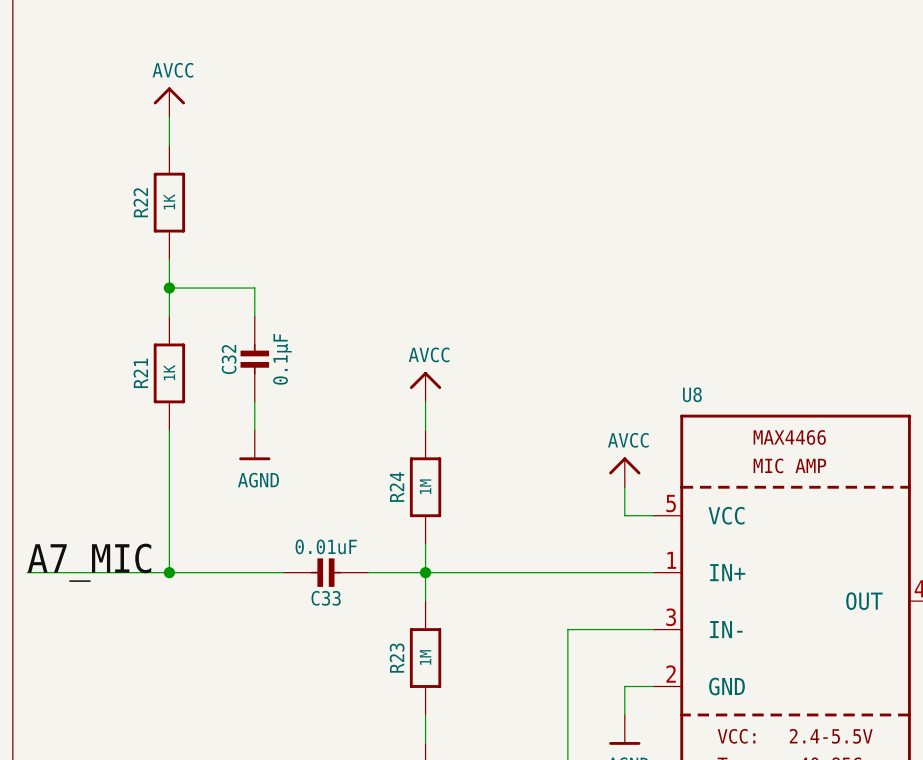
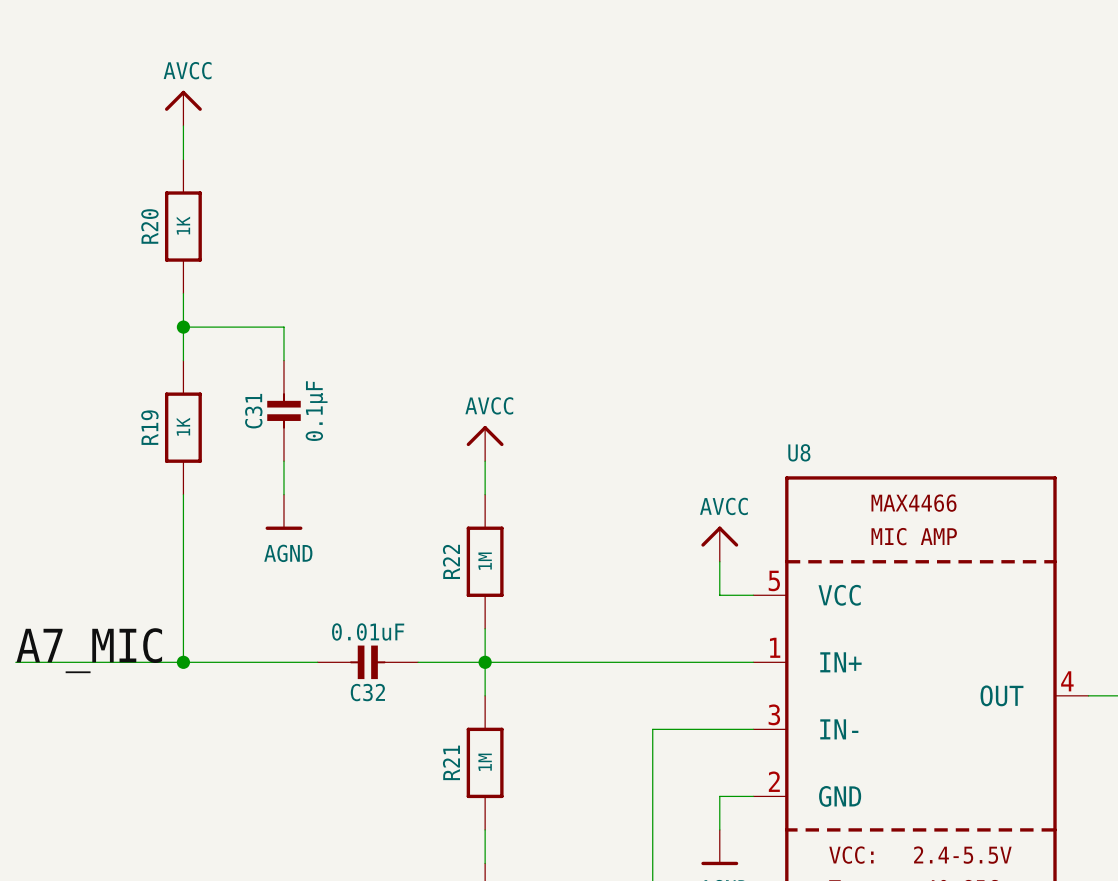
R22 name: R22 (140, 202) -> R20 (149, 226)
C32 name: C32 (229, 359) -> C31 (253, 411)
R21 name: R21 (140, 373) -> R19 (149, 427)
R24 name: R24 (396, 487) -> R22 (451, 561)
C33 name: C33 (326, 598) -> C32 (367, 692)
R23 name: R23 (397, 658) -> R21 (451, 762)

